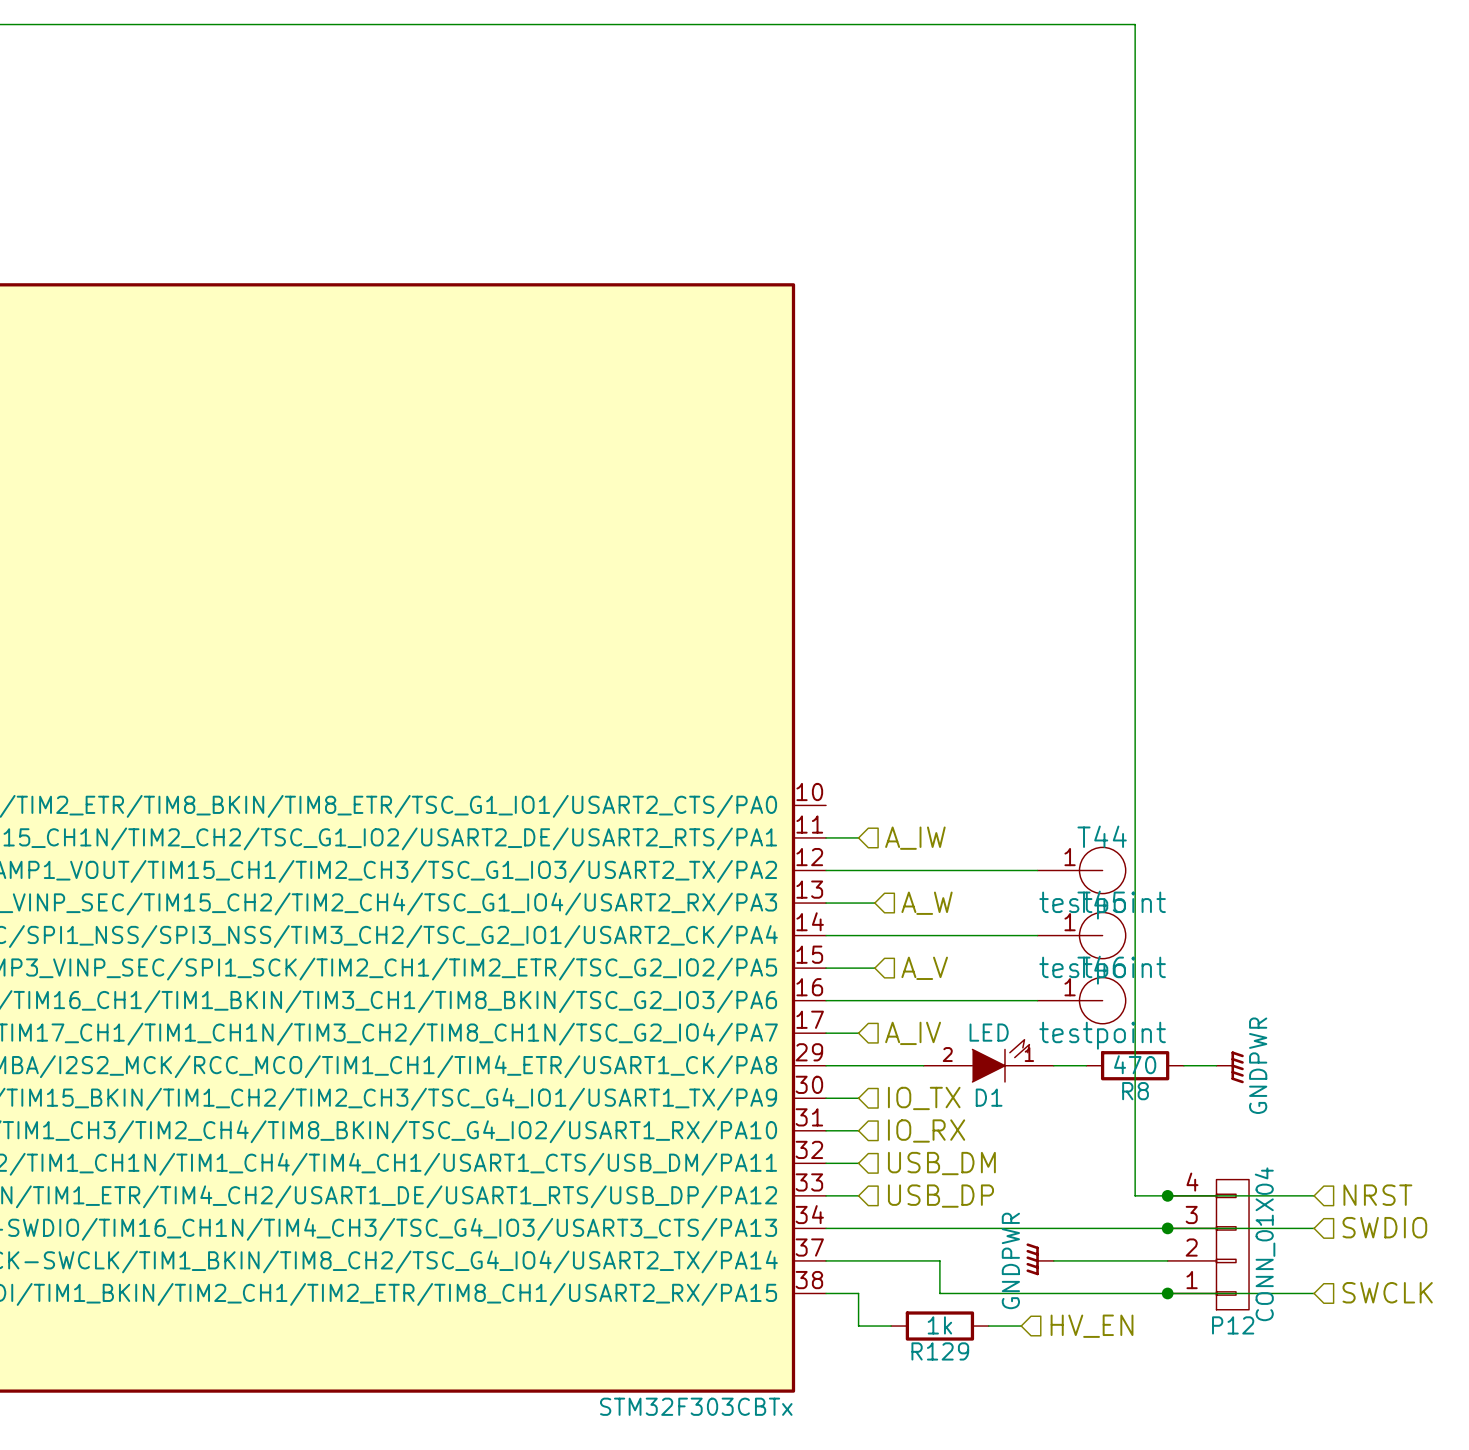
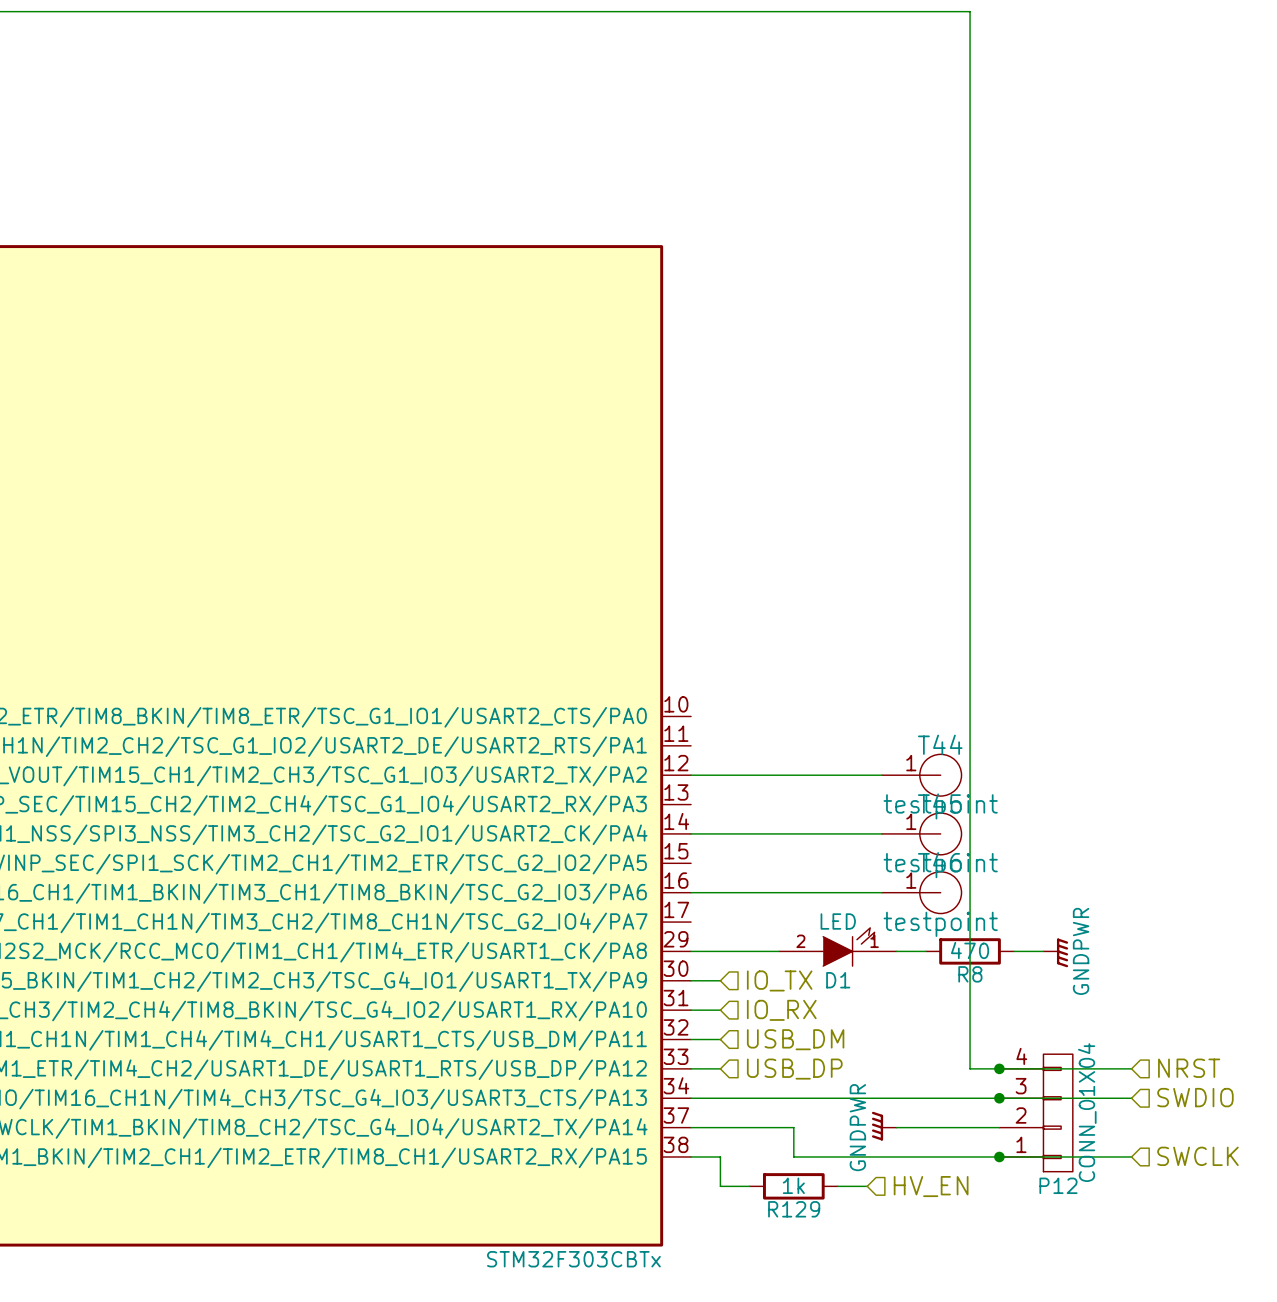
wire: (826, 837) (858, 837) -> none
hierarchical label: A_IW (915, 838) -> none
wire: (826, 903) (874, 903) -> none
hierarchical label: A_W (927, 903) -> none
wire: (826, 968) (874, 968) -> none
hierarchical label: A_V (924, 968) -> none
wire: (826, 1033) (858, 1033) -> none
hierarchical label: A_IV (913, 1033) -> none

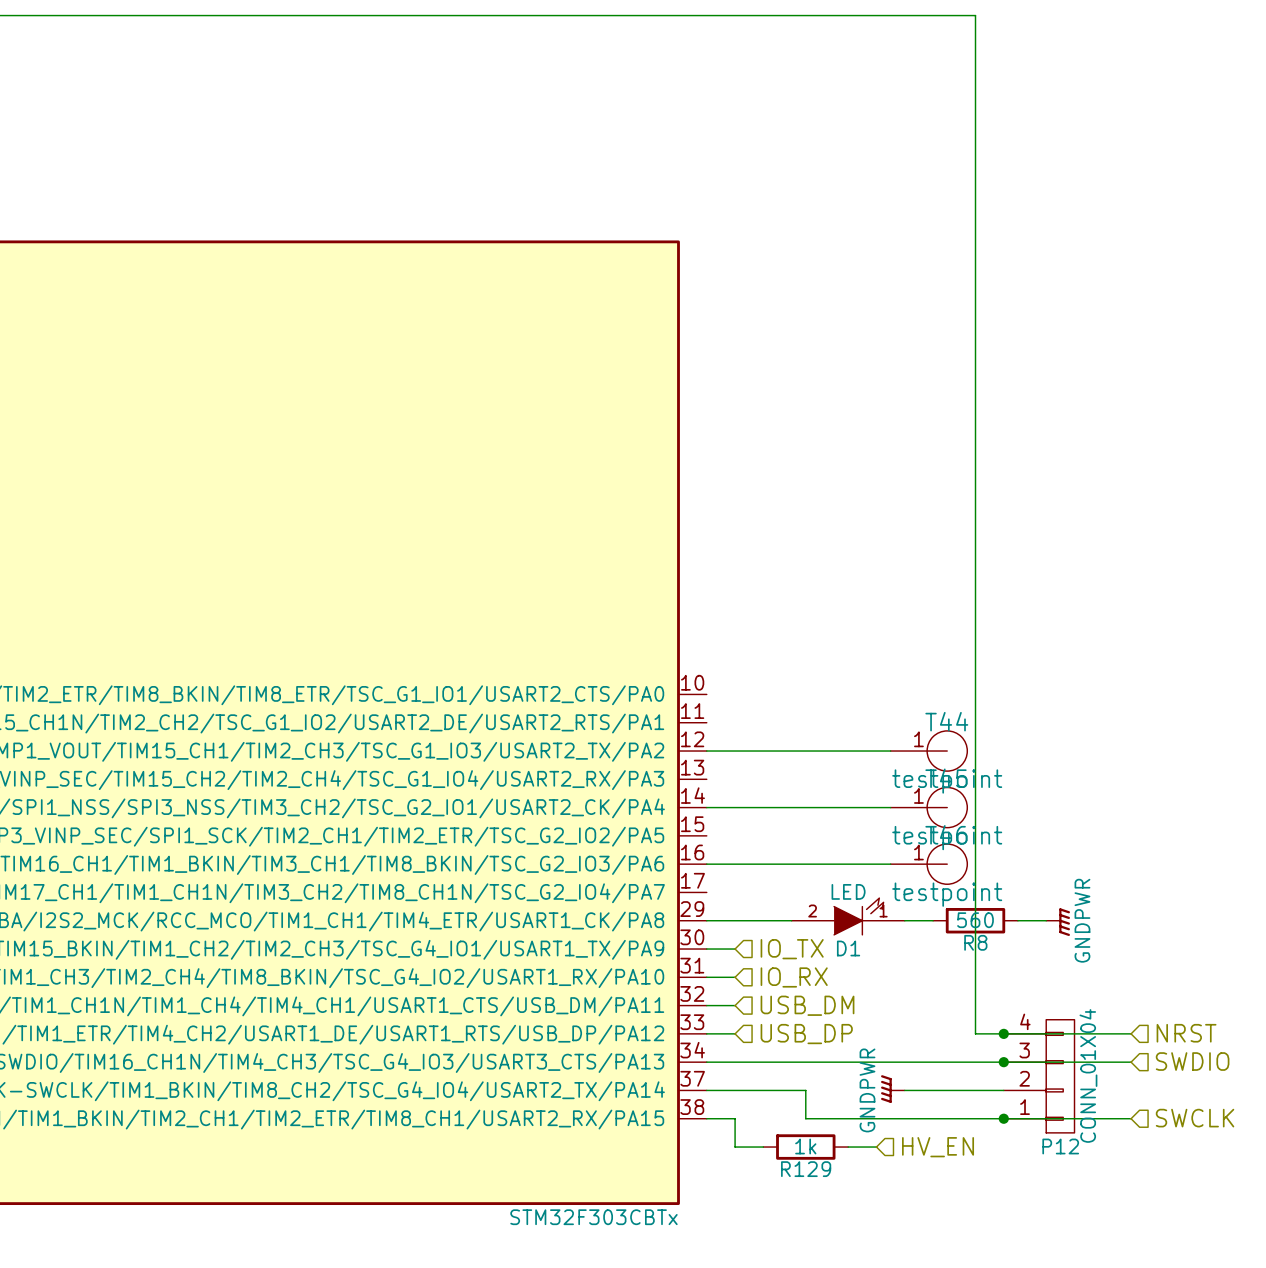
R8 value: 470 (970, 950) -> 560 (975, 920)

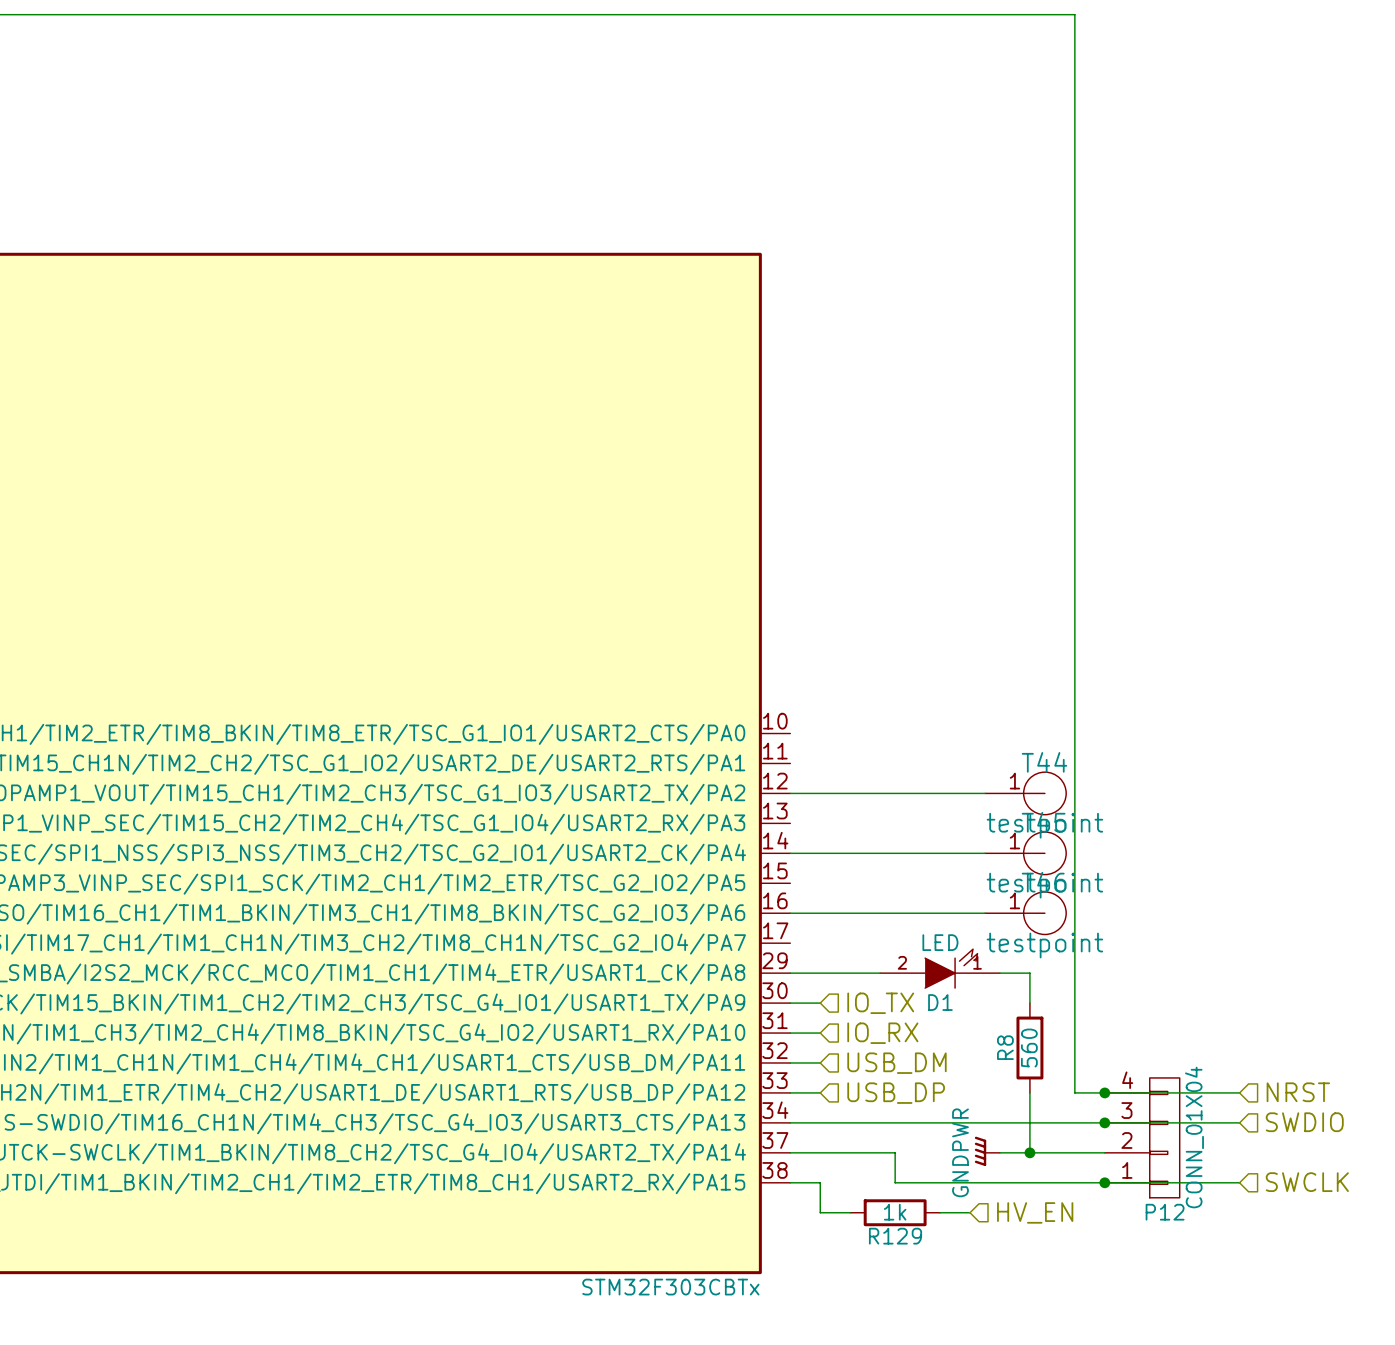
wire: none -> (1029, 973) (1029, 1003)
R8 rotation: 0° (975, 920) -> 90° clockwise (1029, 1048)
R8 position: (975, 920) -> (1029, 1048)
wire: (1017, 920) (1046, 920) -> none
power symbol: GNDPWR (1058, 922) -> none
wire: none -> (1029, 1092) (1029, 1152)
junction: none -> (1029, 1152)

